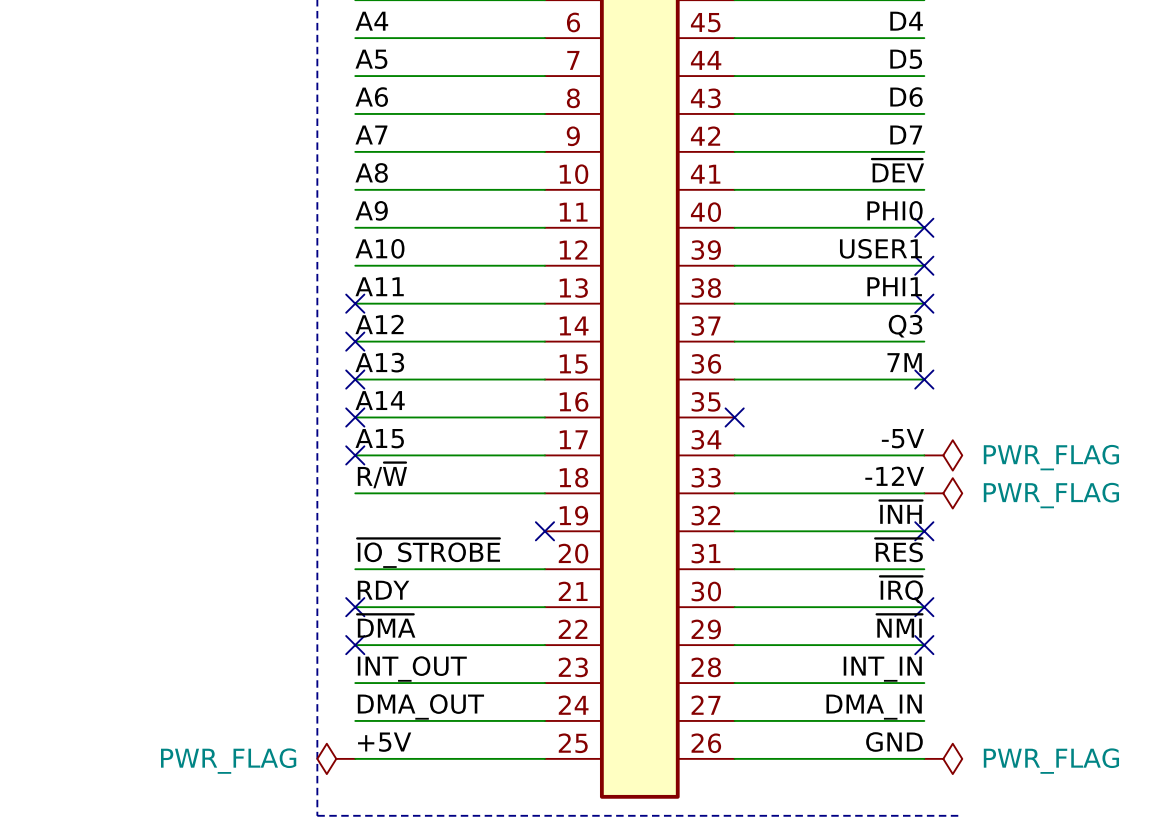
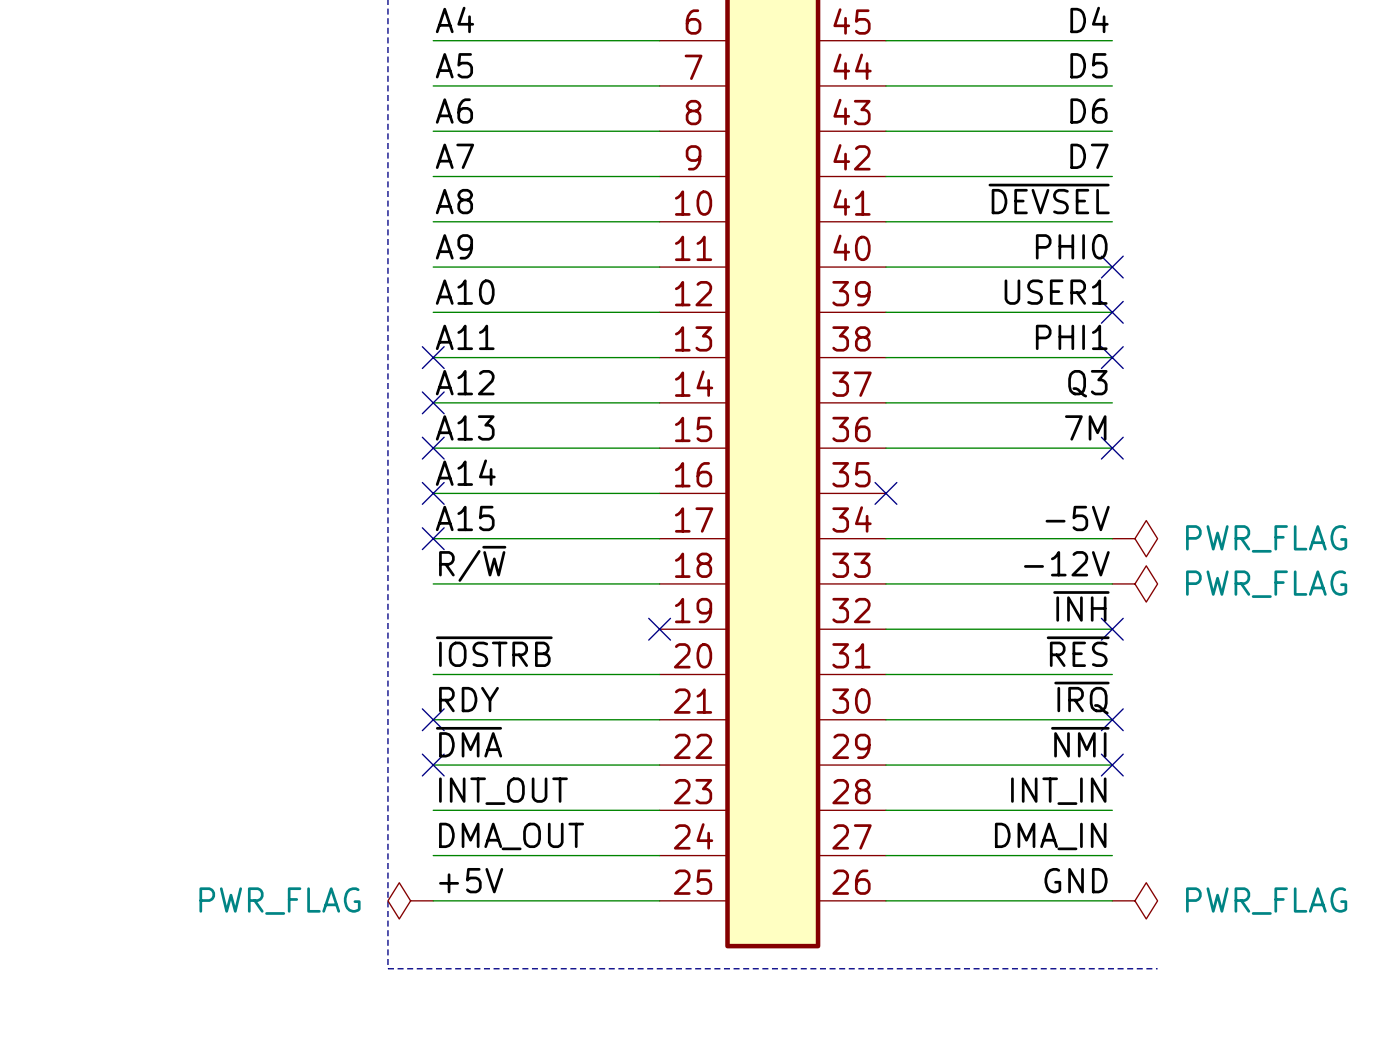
label: ~{DEV} (898, 170) -> ~{DEVSEL} (1049, 198)
label: ~{IO_STROBE} (428, 553) -> ~{IOSTRB} (494, 651)

